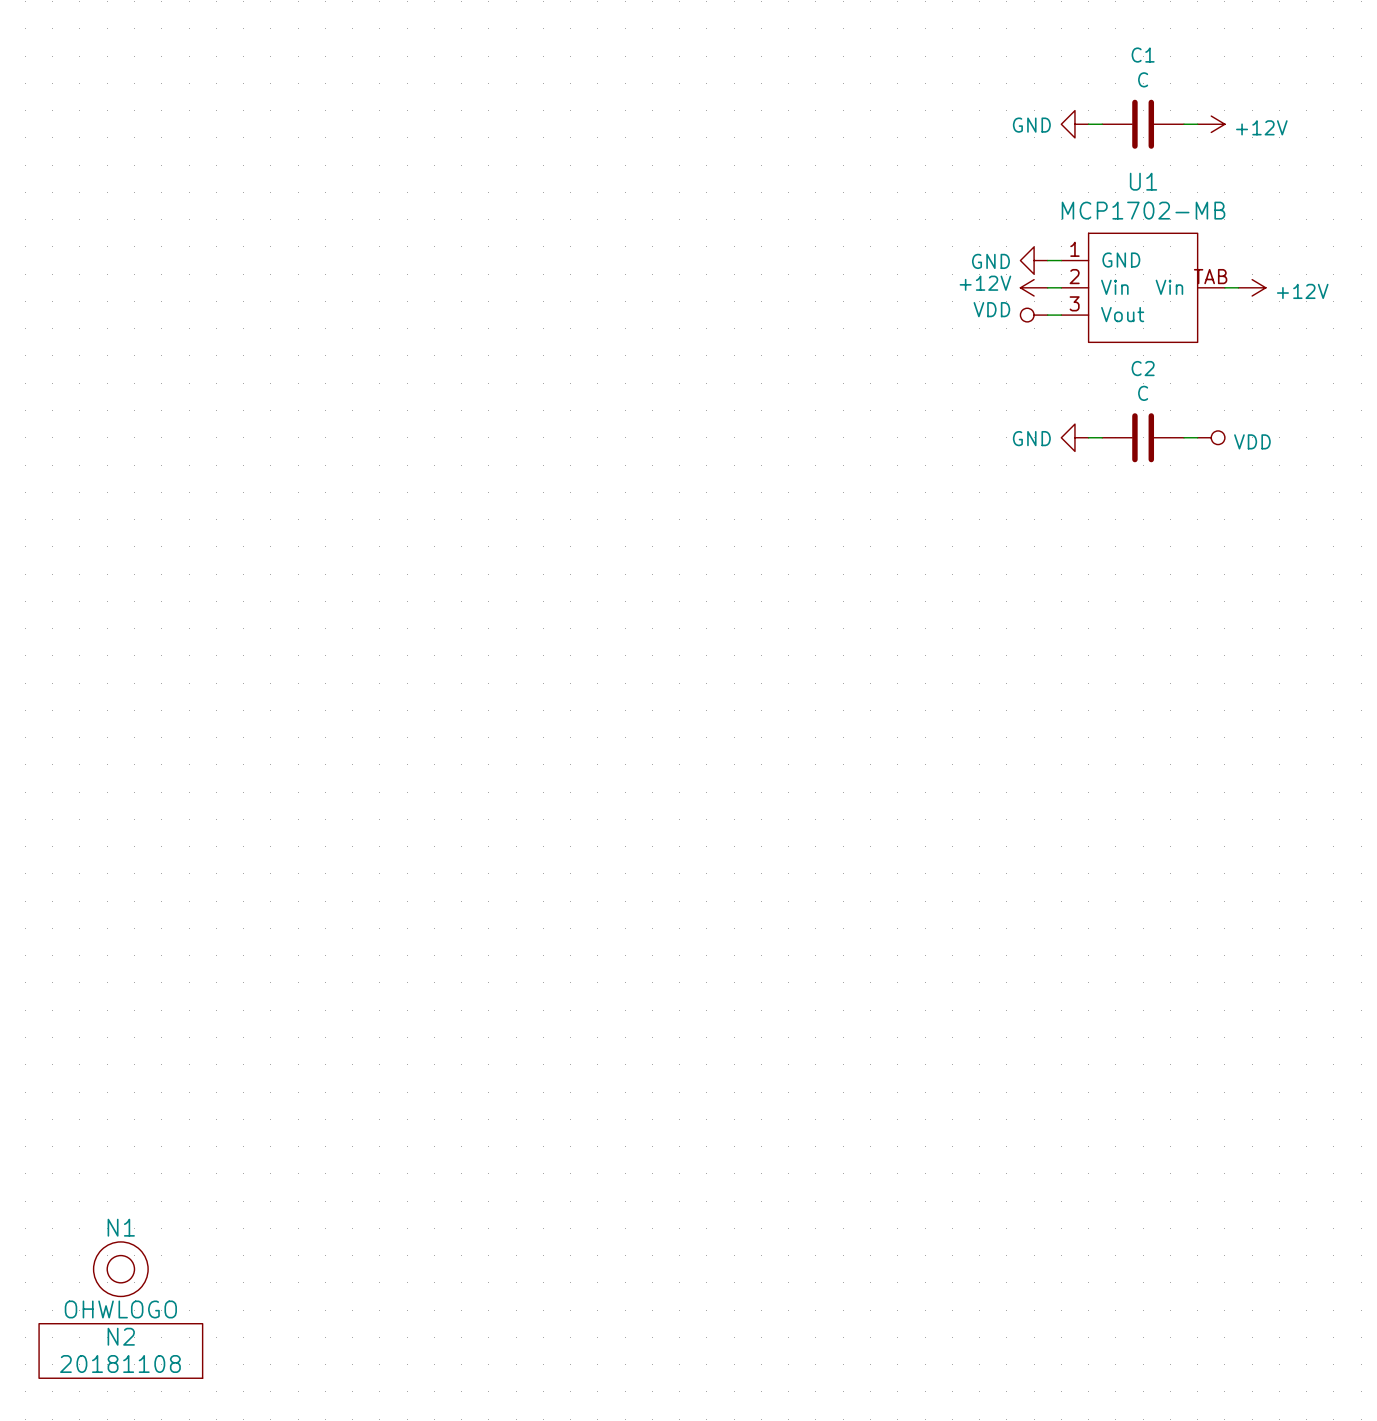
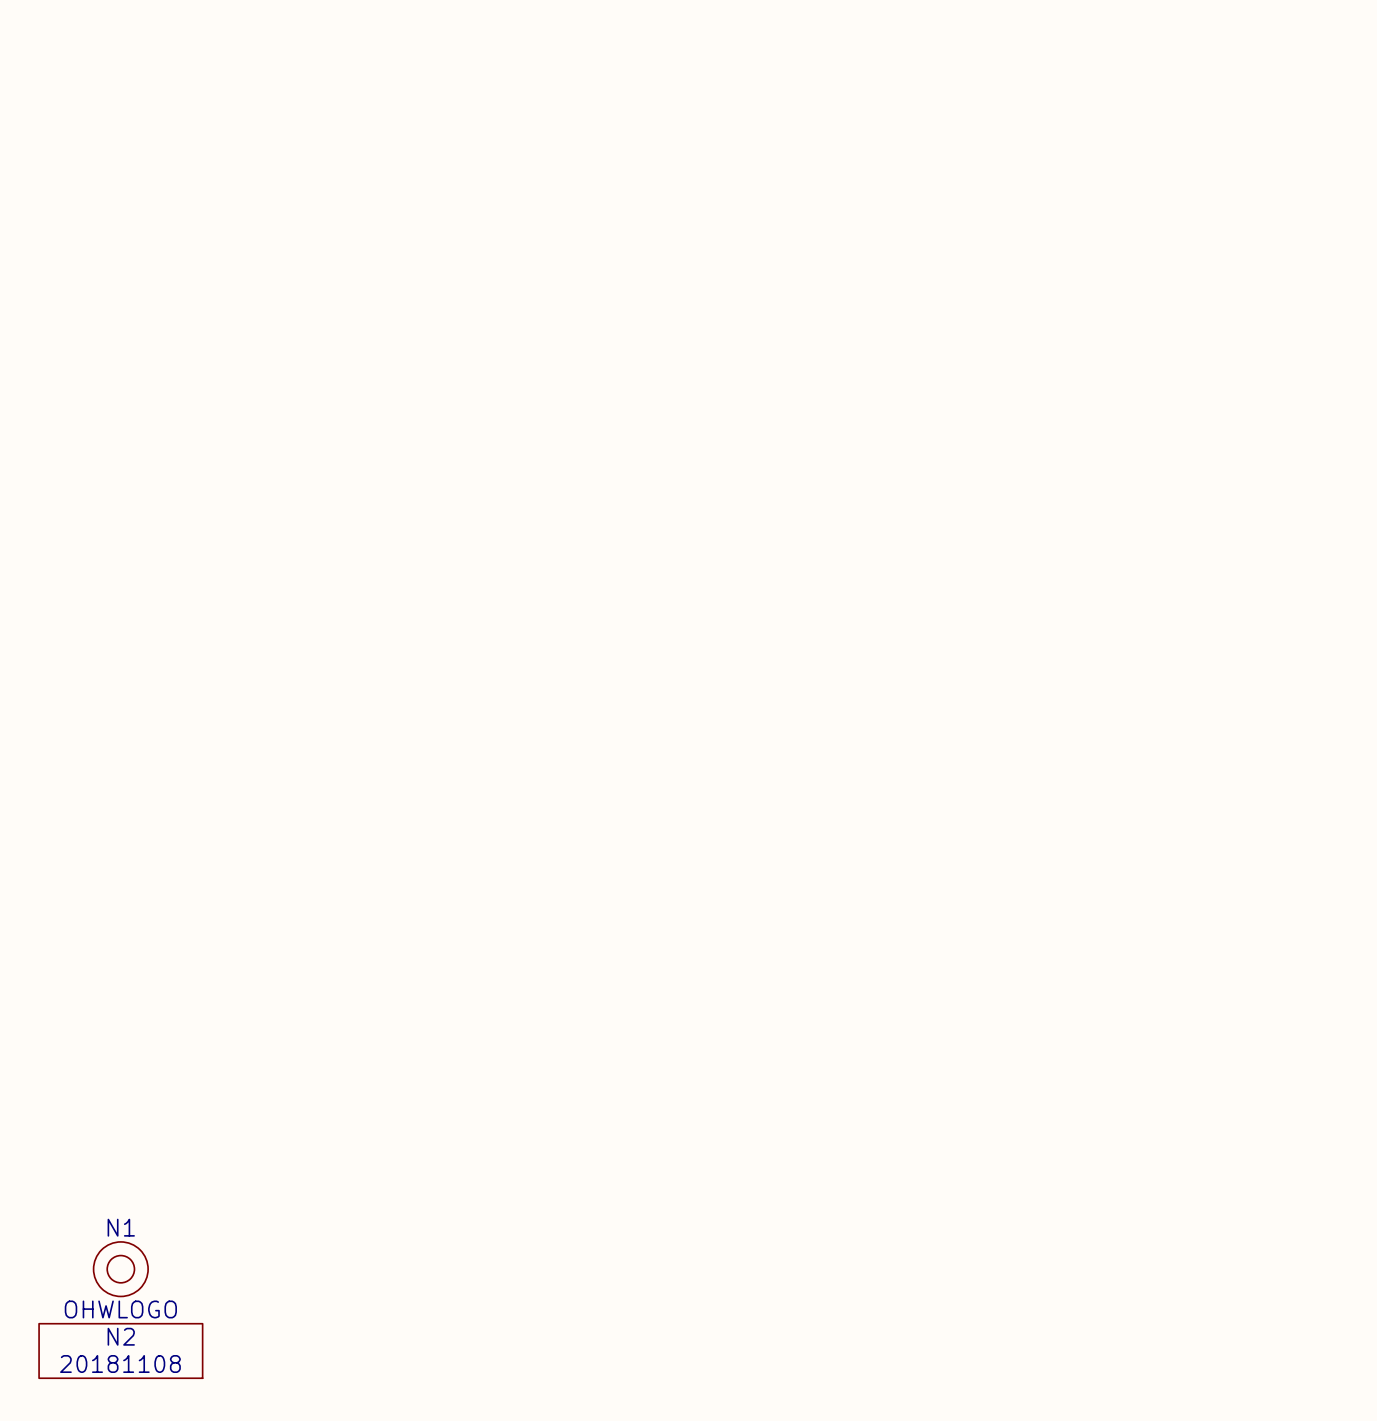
power symbol: GND (1074, 124) -> none
wire: (1088, 124) (1102, 124) -> none
C1: C (1143, 124) -> none
wire: (1184, 124) (1197, 124) -> none
power symbol: +12V (1211, 124) -> none
power symbol: GND (1034, 260) -> none
wire: (1047, 260) (1061, 260) -> none
power symbol: +12V (1034, 287) -> none
wire: (1047, 287) (1061, 287) -> none
U1: MCP1702-MB (1143, 287) -> none
wire: (1224, 287) (1238, 287) -> none
power symbol: +12V (1252, 287) -> none
power symbol: VDD (1034, 315) -> none
wire: (1047, 315) (1061, 315) -> none
power symbol: GND (1074, 437) -> none
wire: (1088, 437) (1102, 437) -> none
C2: C (1143, 437) -> none
wire: (1184, 437) (1197, 437) -> none
power symbol: VDD (1211, 437) -> none

